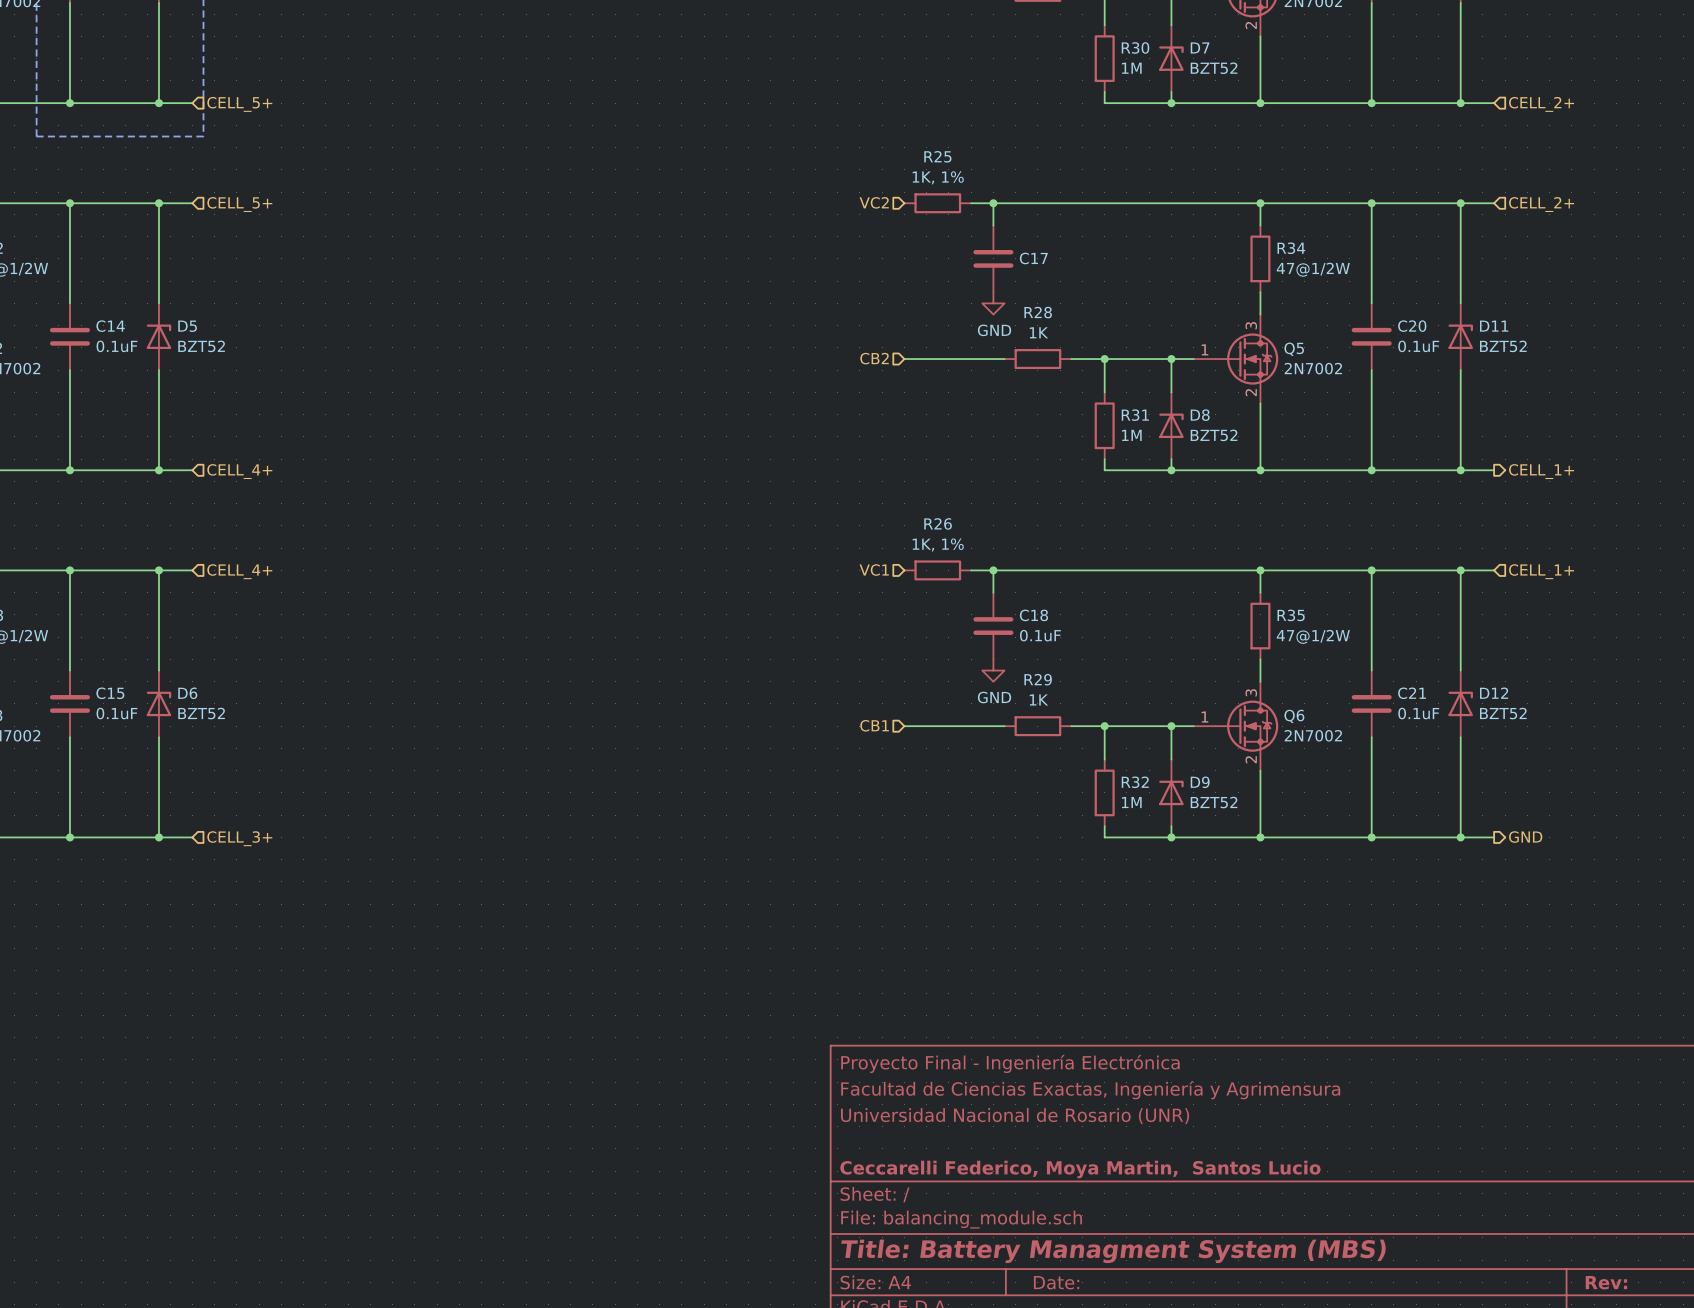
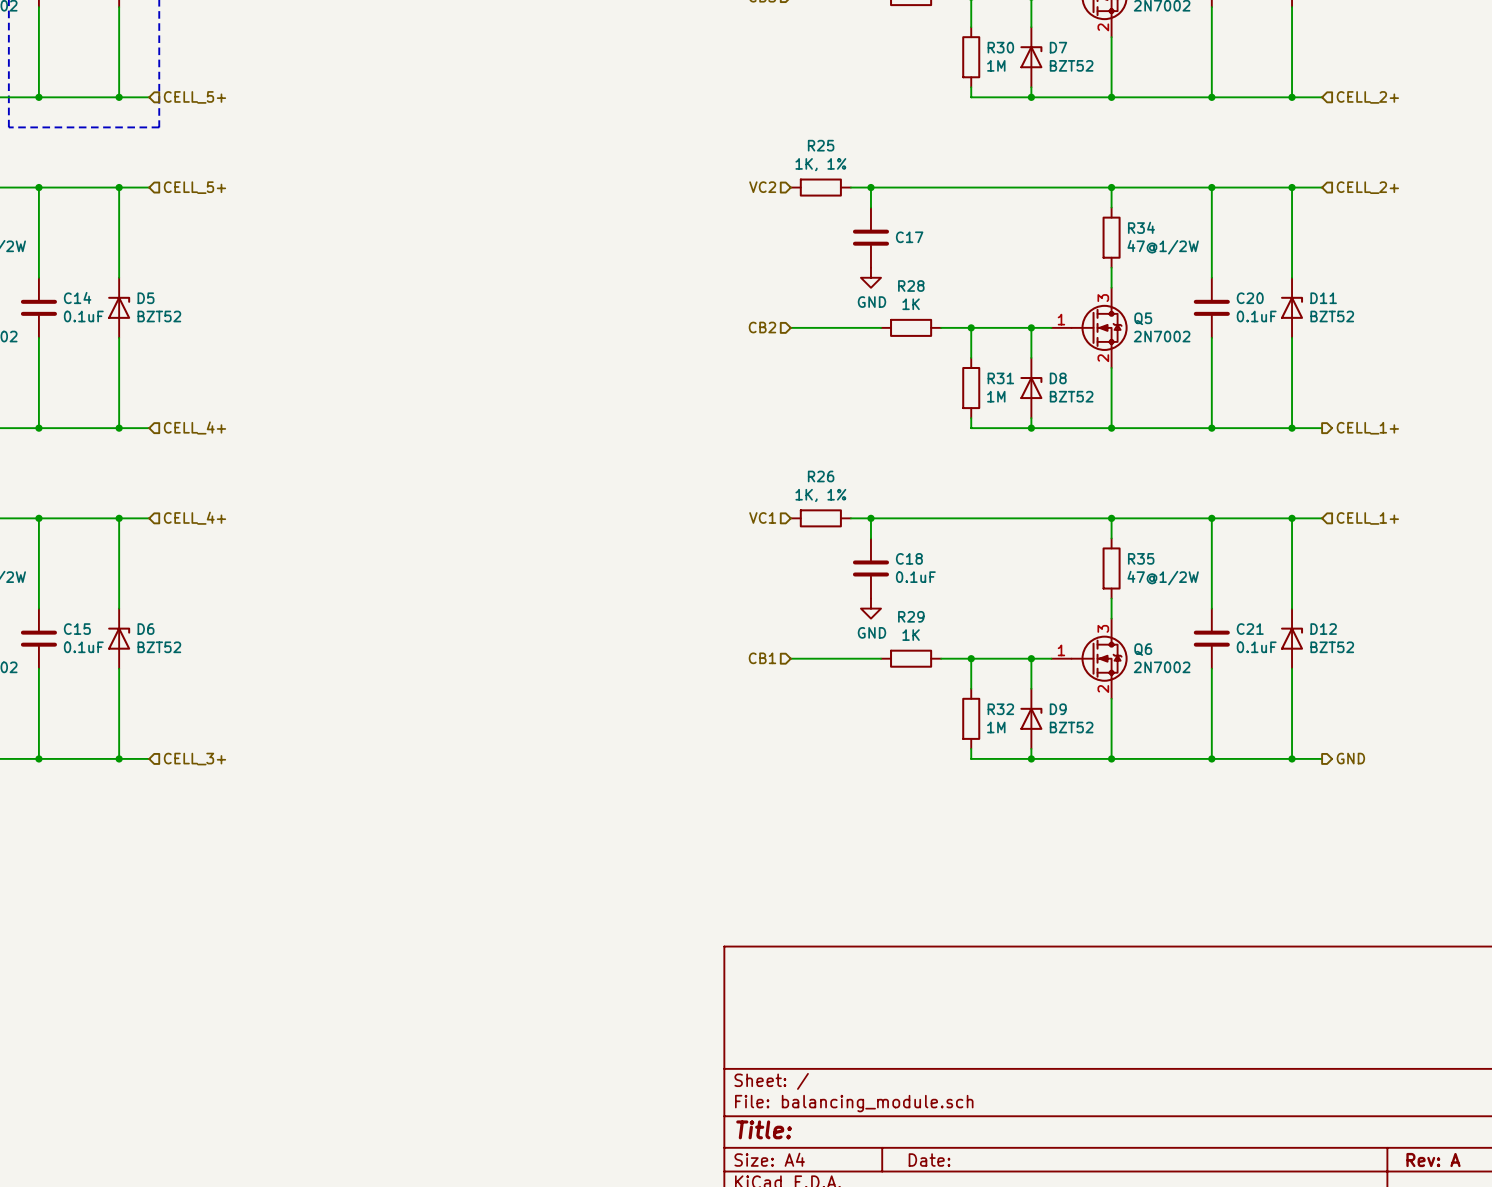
title block: Proyecto Final - Ingeniería Electrónica (1010, 1063) -> none
title block: Facultad de Ciencias Exactas, Ingeniería y Agrimensura (1090, 1090) -> none
title block: Universidad Nacional de Rosario (UNR) (1015, 1116) -> none
title block: Ceccarelli Federico, Moya Martin, Santos Lucio (1080, 1169) -> none
title block: Title: Battery Managment System (MBS) (1113, 1251) -> Title: (764, 1129)
title block: Rev: (1606, 1282) -> Rev: A (1433, 1160)

